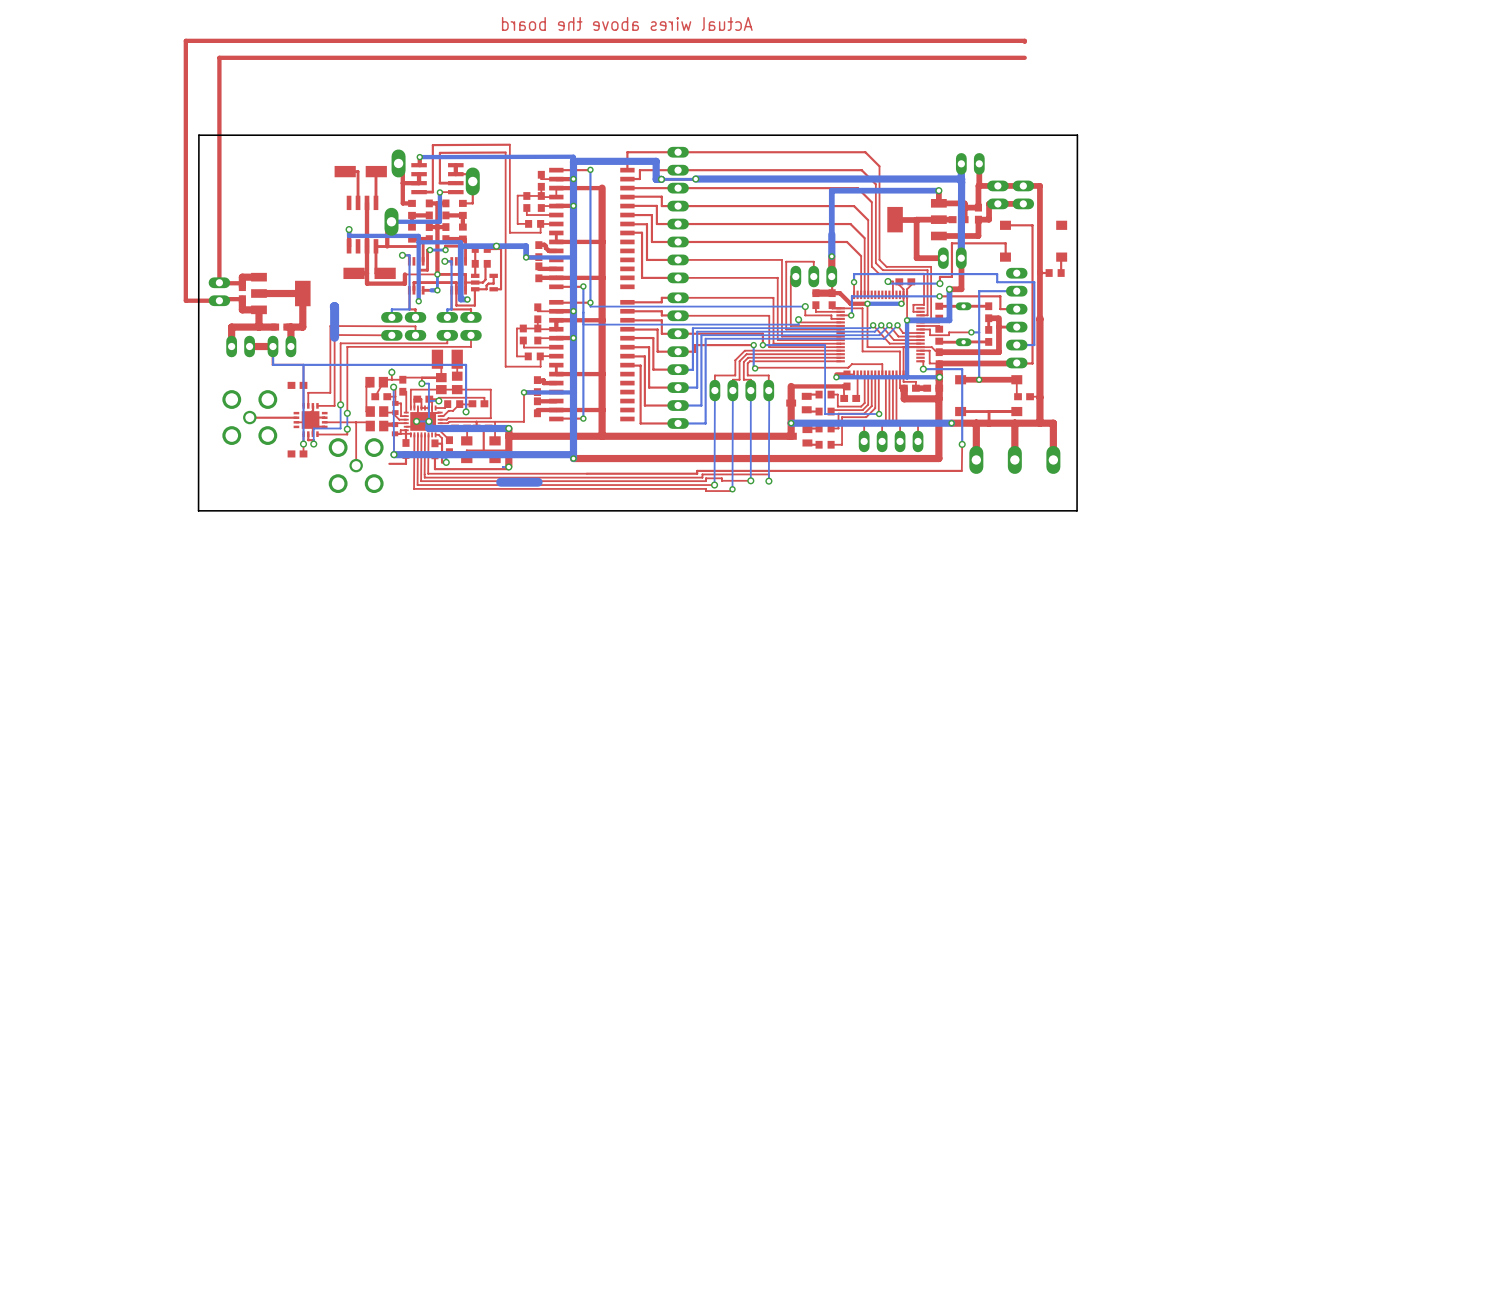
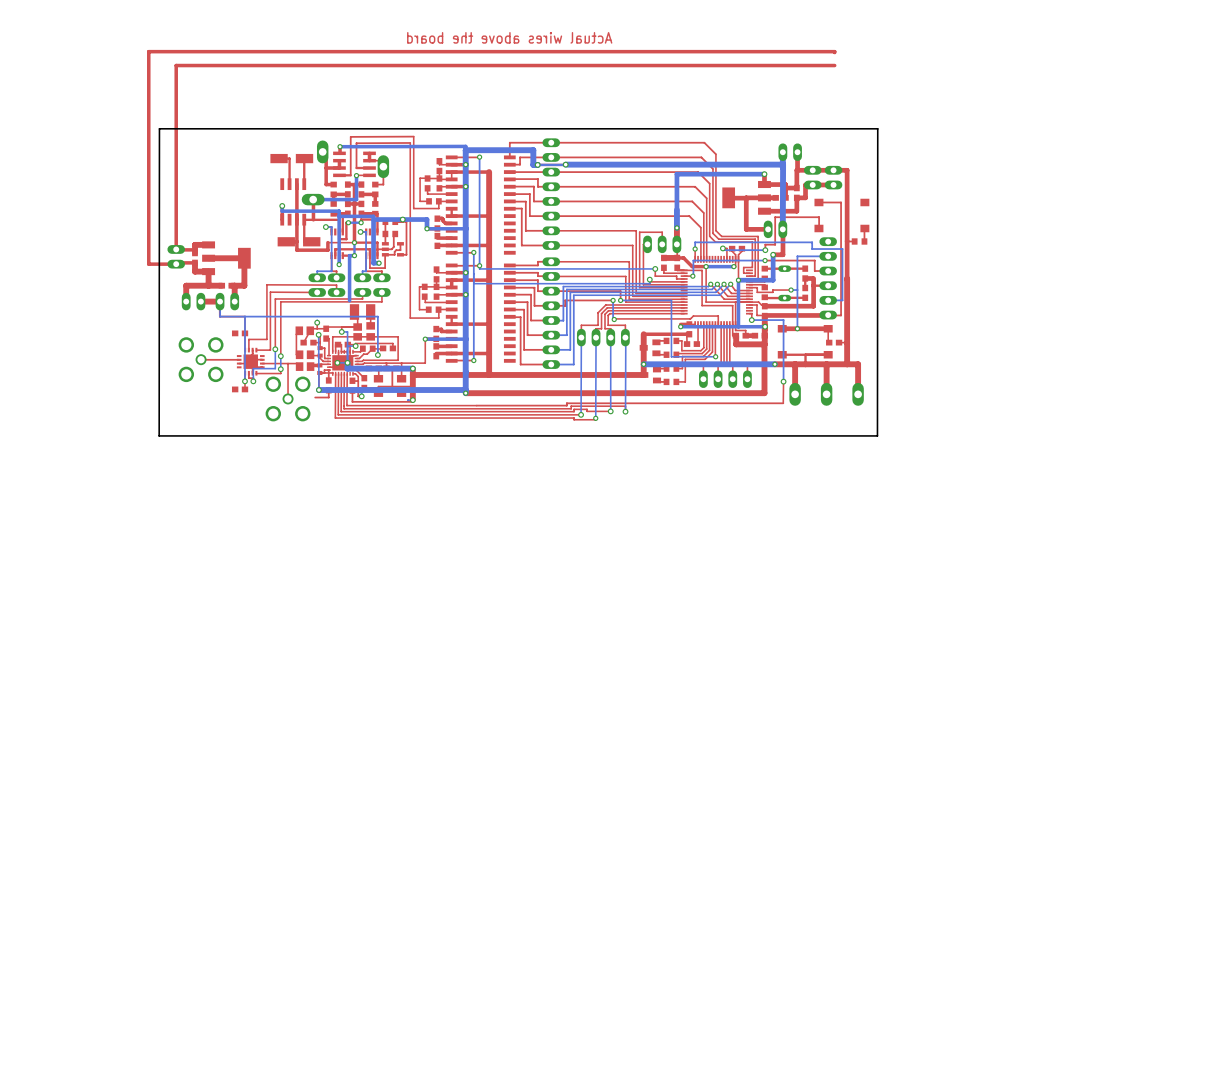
part rotation: 0° (391, 221) -> 90° clockwise (313, 199)
bottom track: none -> (349, 255) (349, 300)
bottom track: (334, 306) (334, 337) -> none
bottom track: (538, 482) (500, 482) -> none

